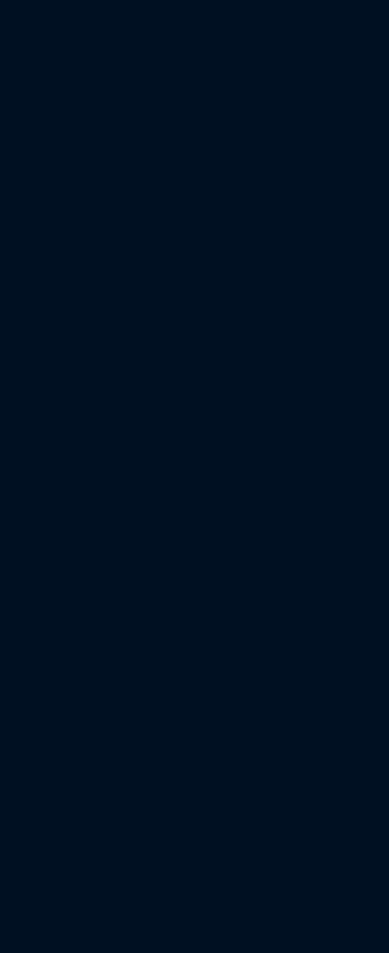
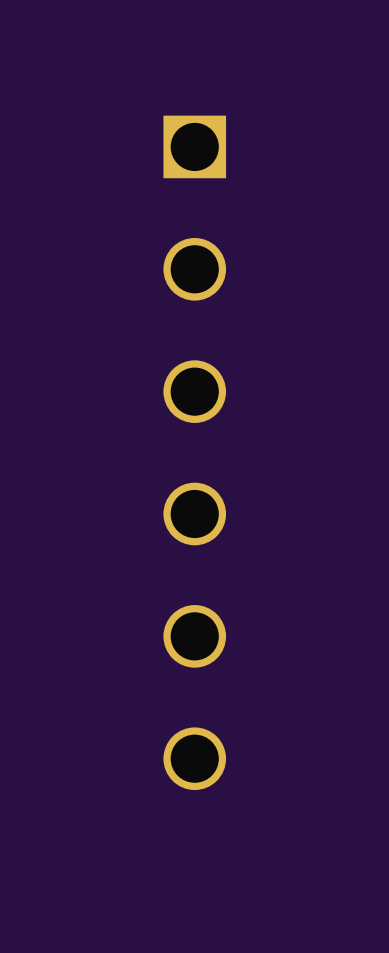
part: none -> (194, 452)

